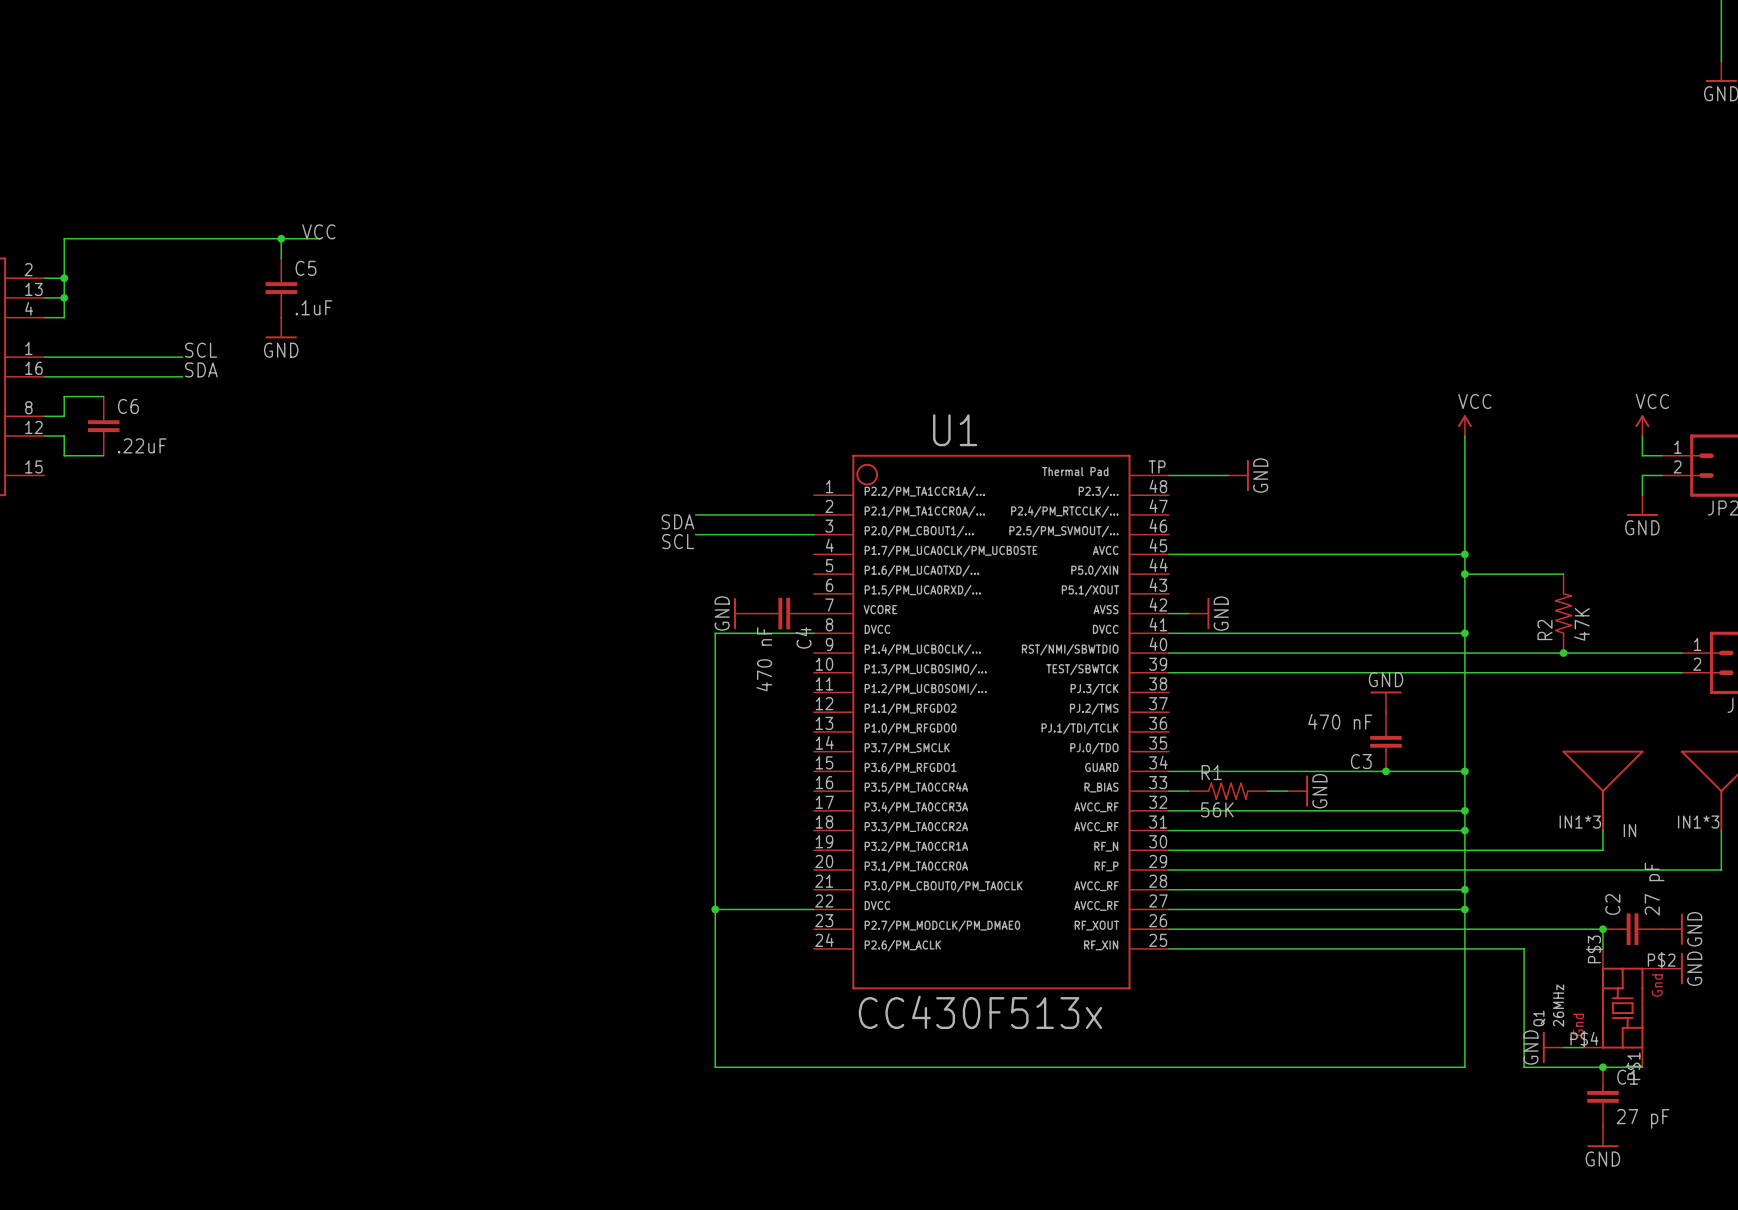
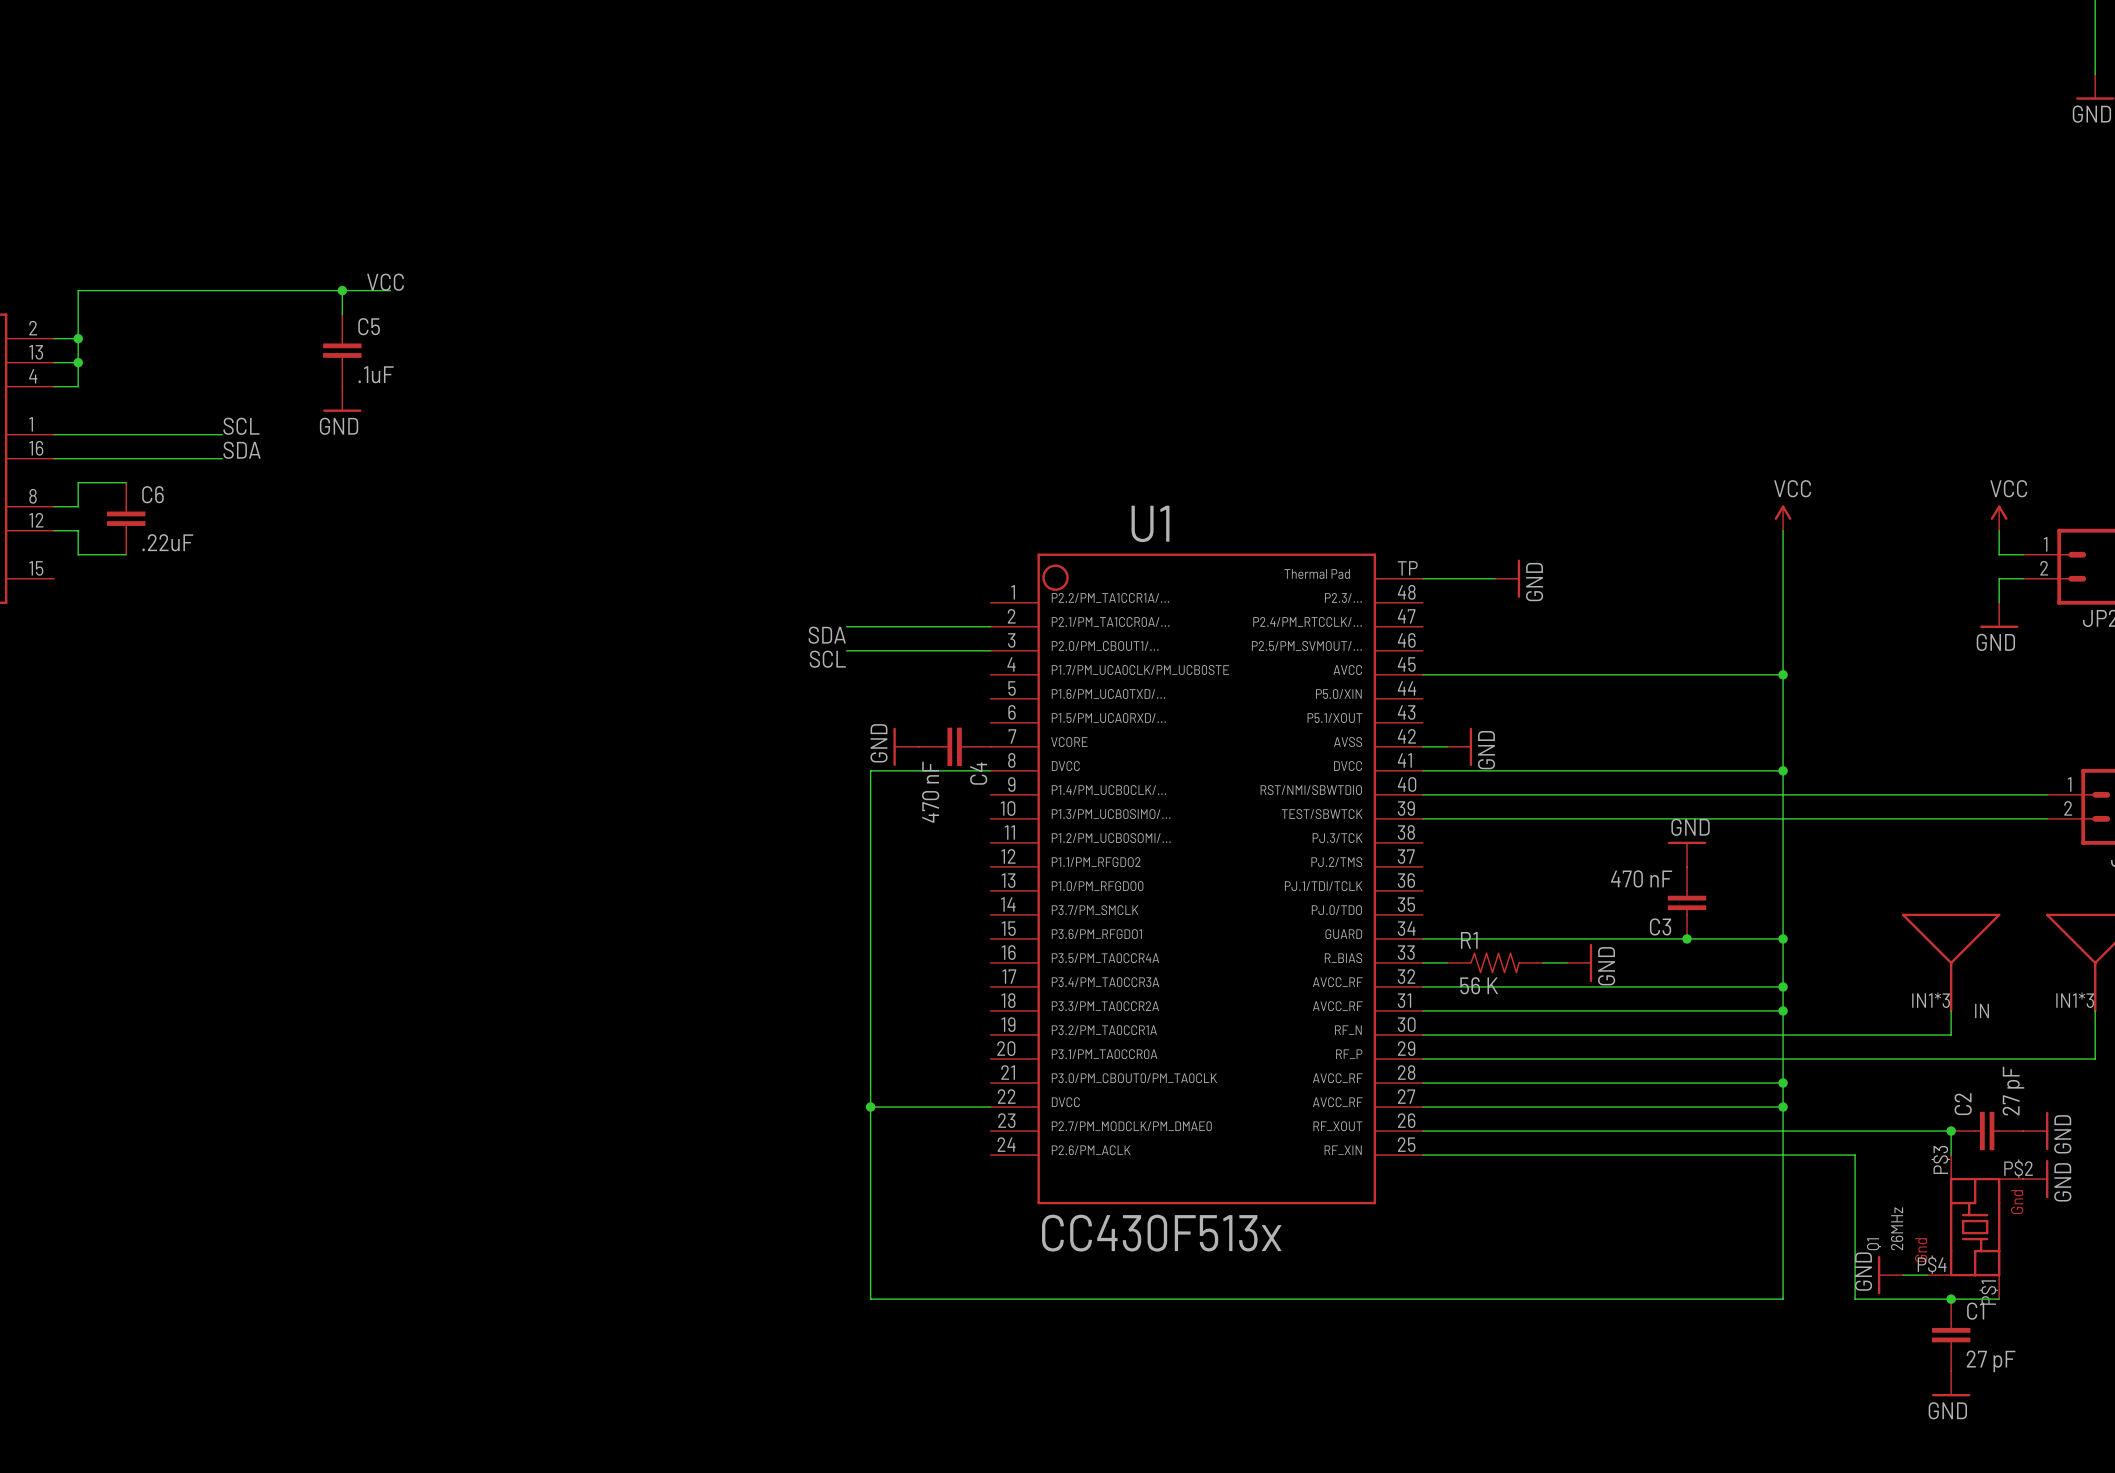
wire: (1464, 574) (1563, 574) -> none
junction: (1464, 574) -> none
R2: 47K (1563, 613) -> none
junction: (1563, 653) -> none
R1 value: 56K (1217, 809) -> 56 K (1479, 985)

